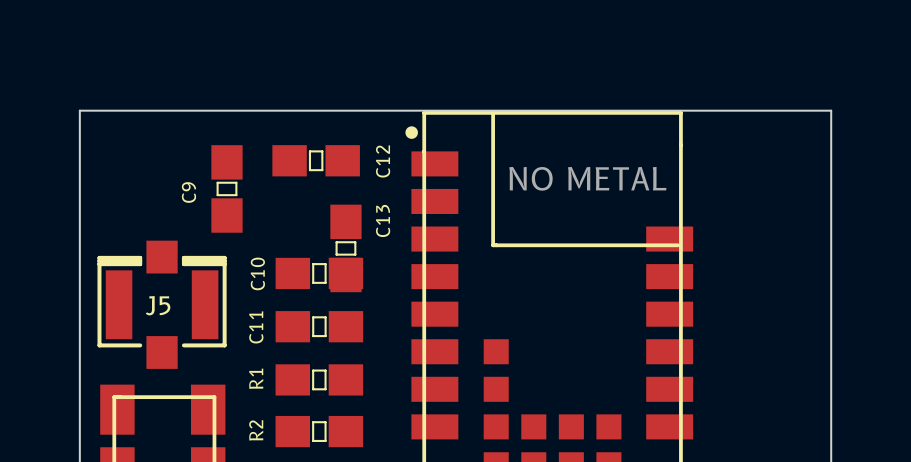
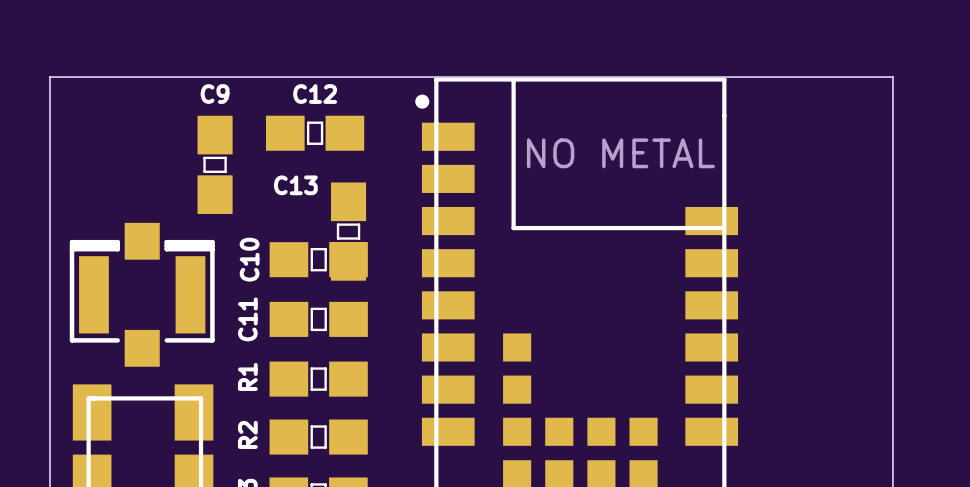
C12 name rotation: 0° (383, 161) -> 90° clockwise (315, 94)
C12 name position: C12 (383, 161) -> C12 (315, 94)
C9 name rotation: 0° (188, 192) -> 90° clockwise (215, 94)
C9 name position: C9 (188, 192) -> C9 (215, 94)
C13 name rotation: 0° (383, 220) -> 90° clockwise (295, 185)
C13 name position: C13 (383, 220) -> C13 (295, 185)
J5 name: J5 (158, 305) -> none

